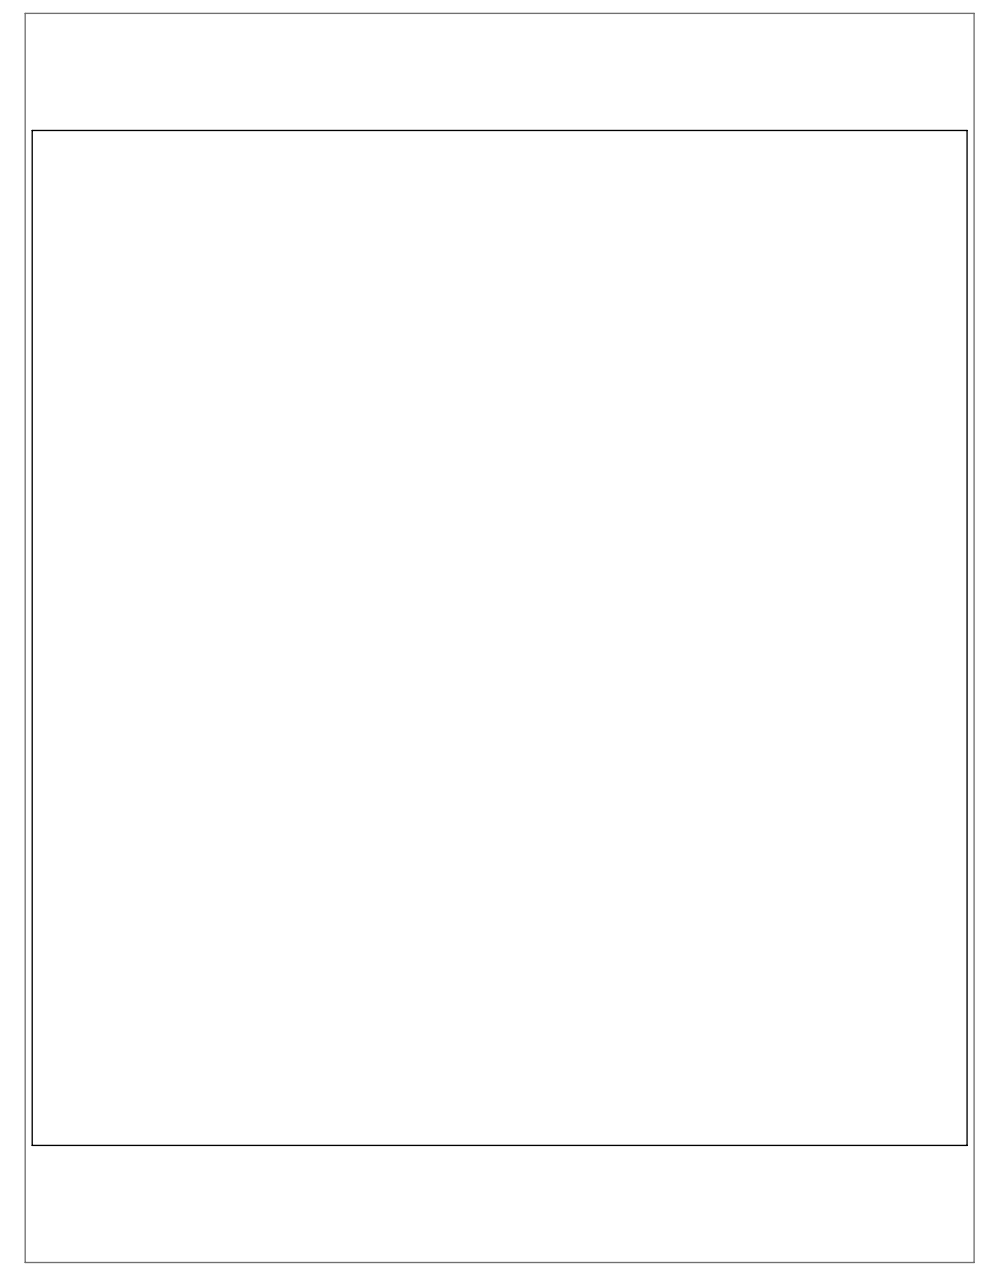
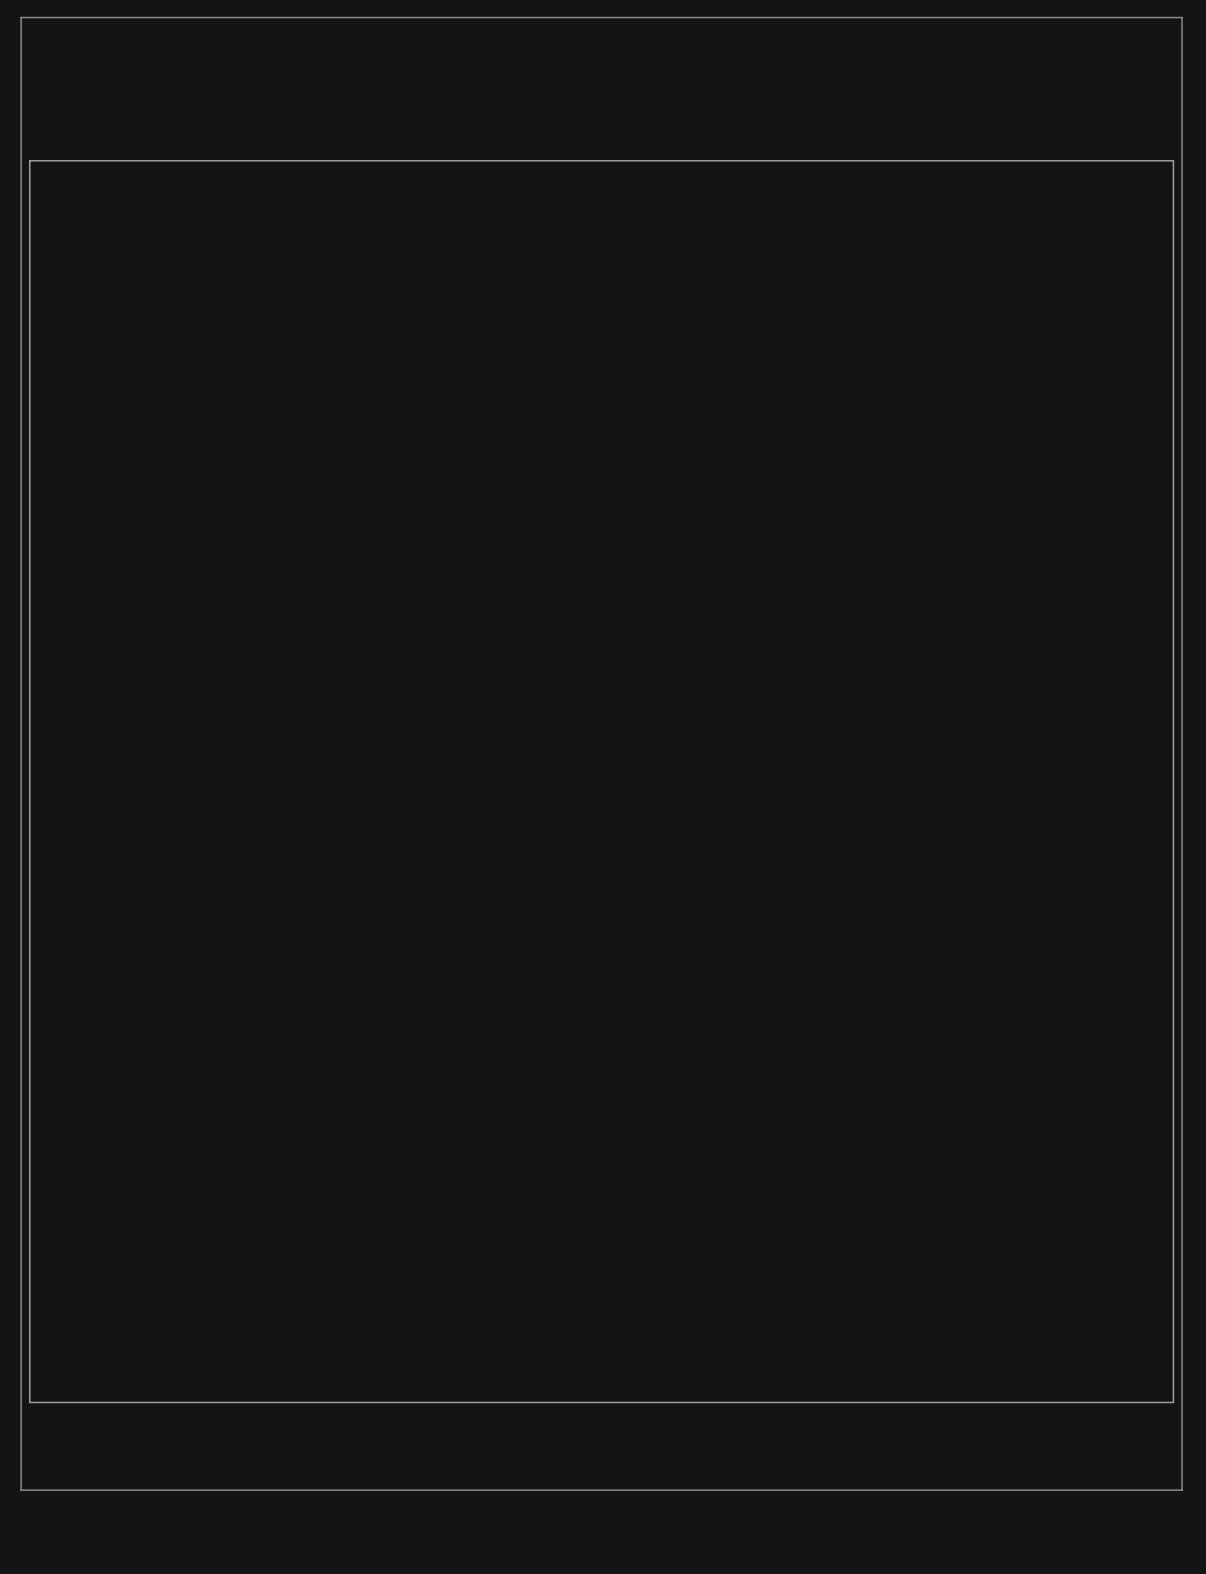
line: (25, 1217) (25, 1262) (974, 1262) (974, 1217) -> (21, 1490) (1182, 1490)

